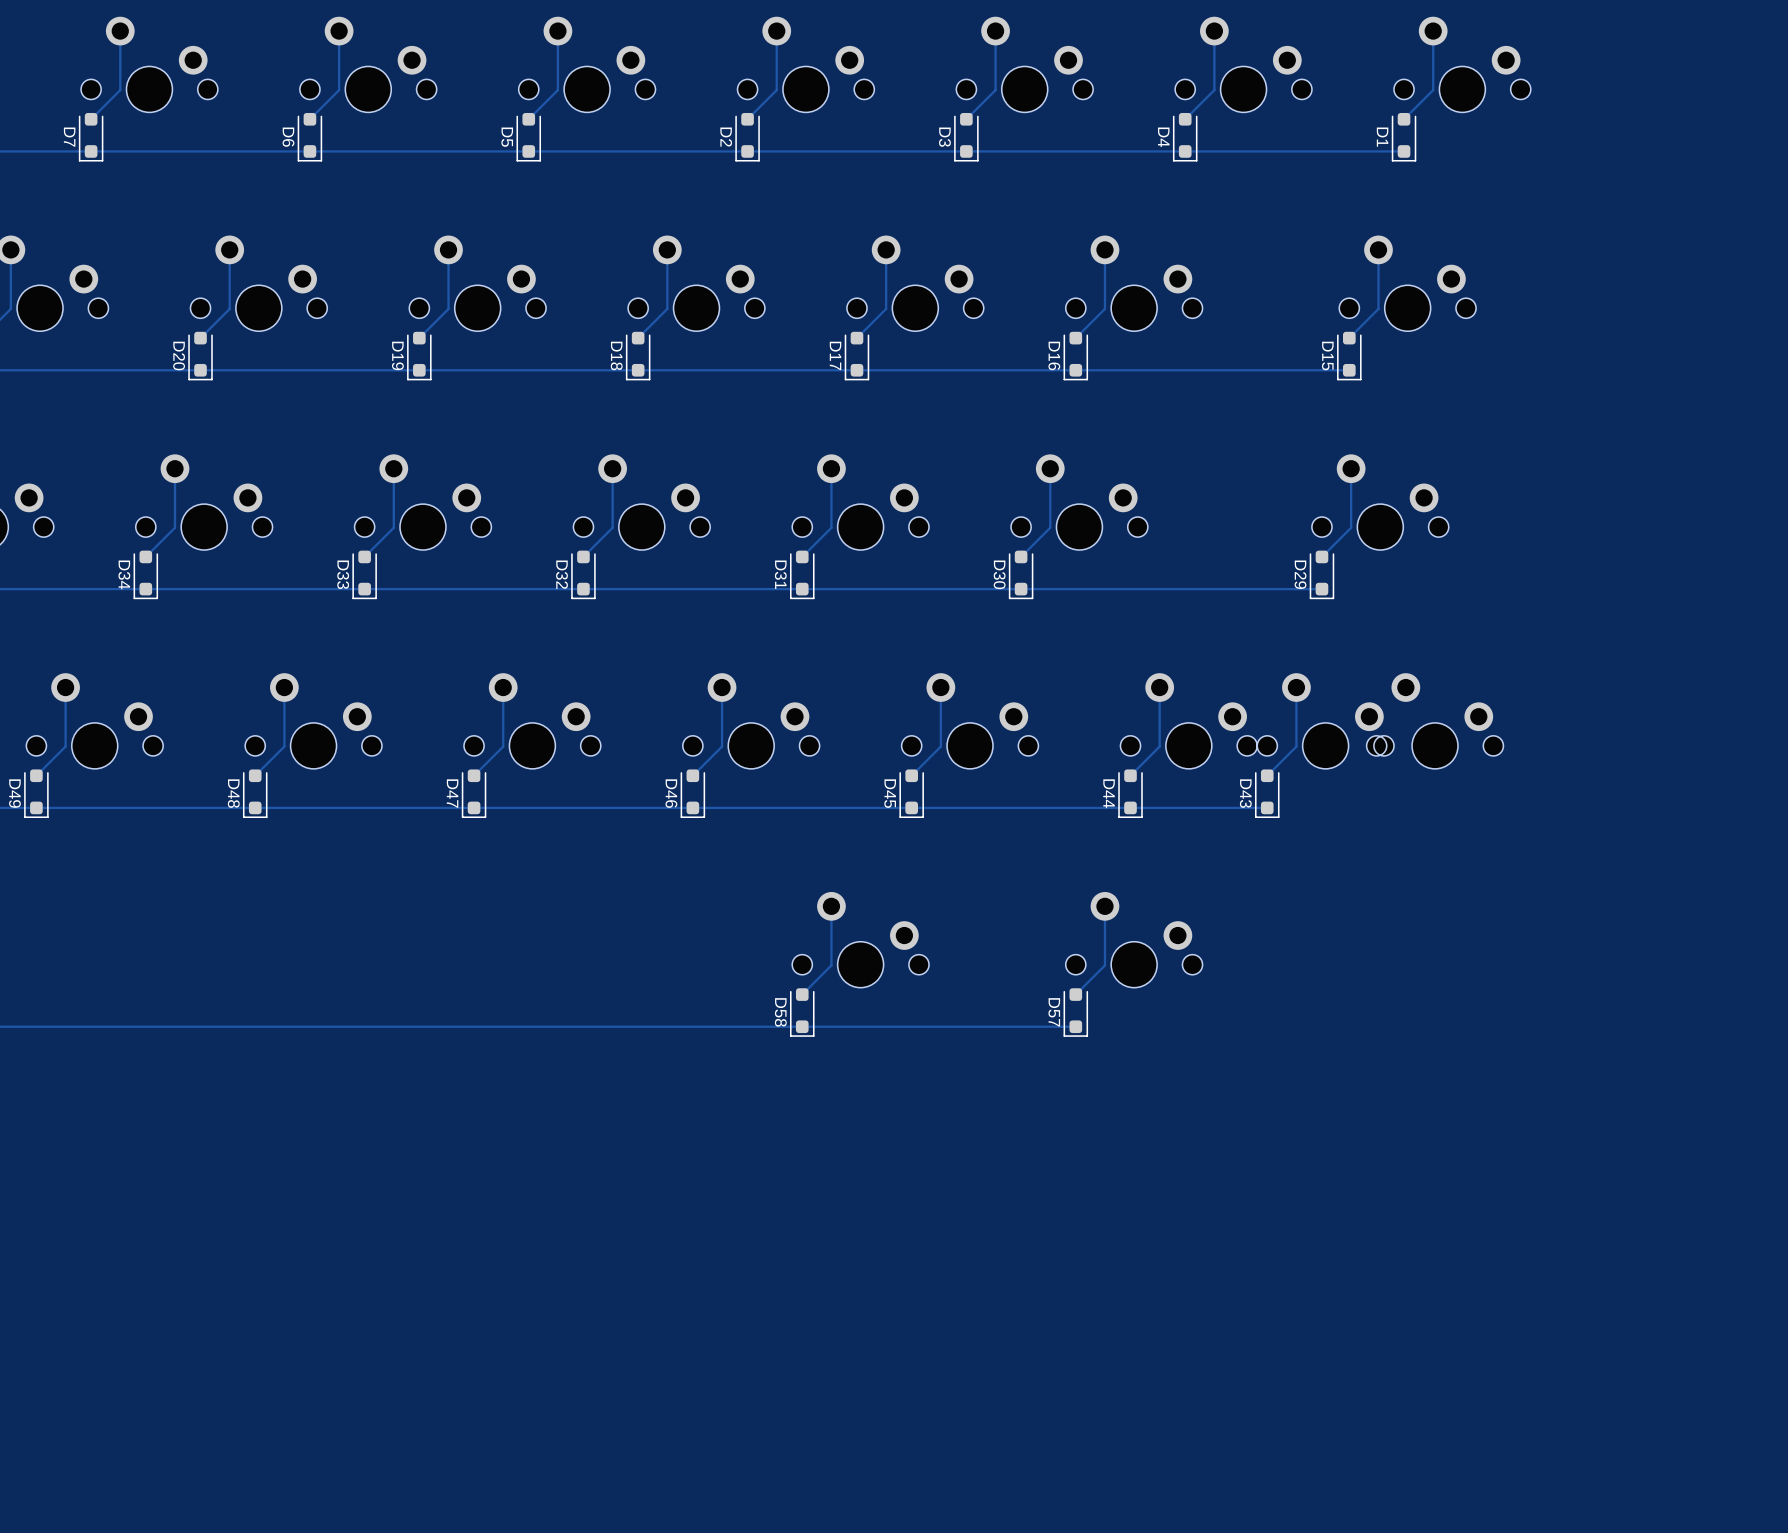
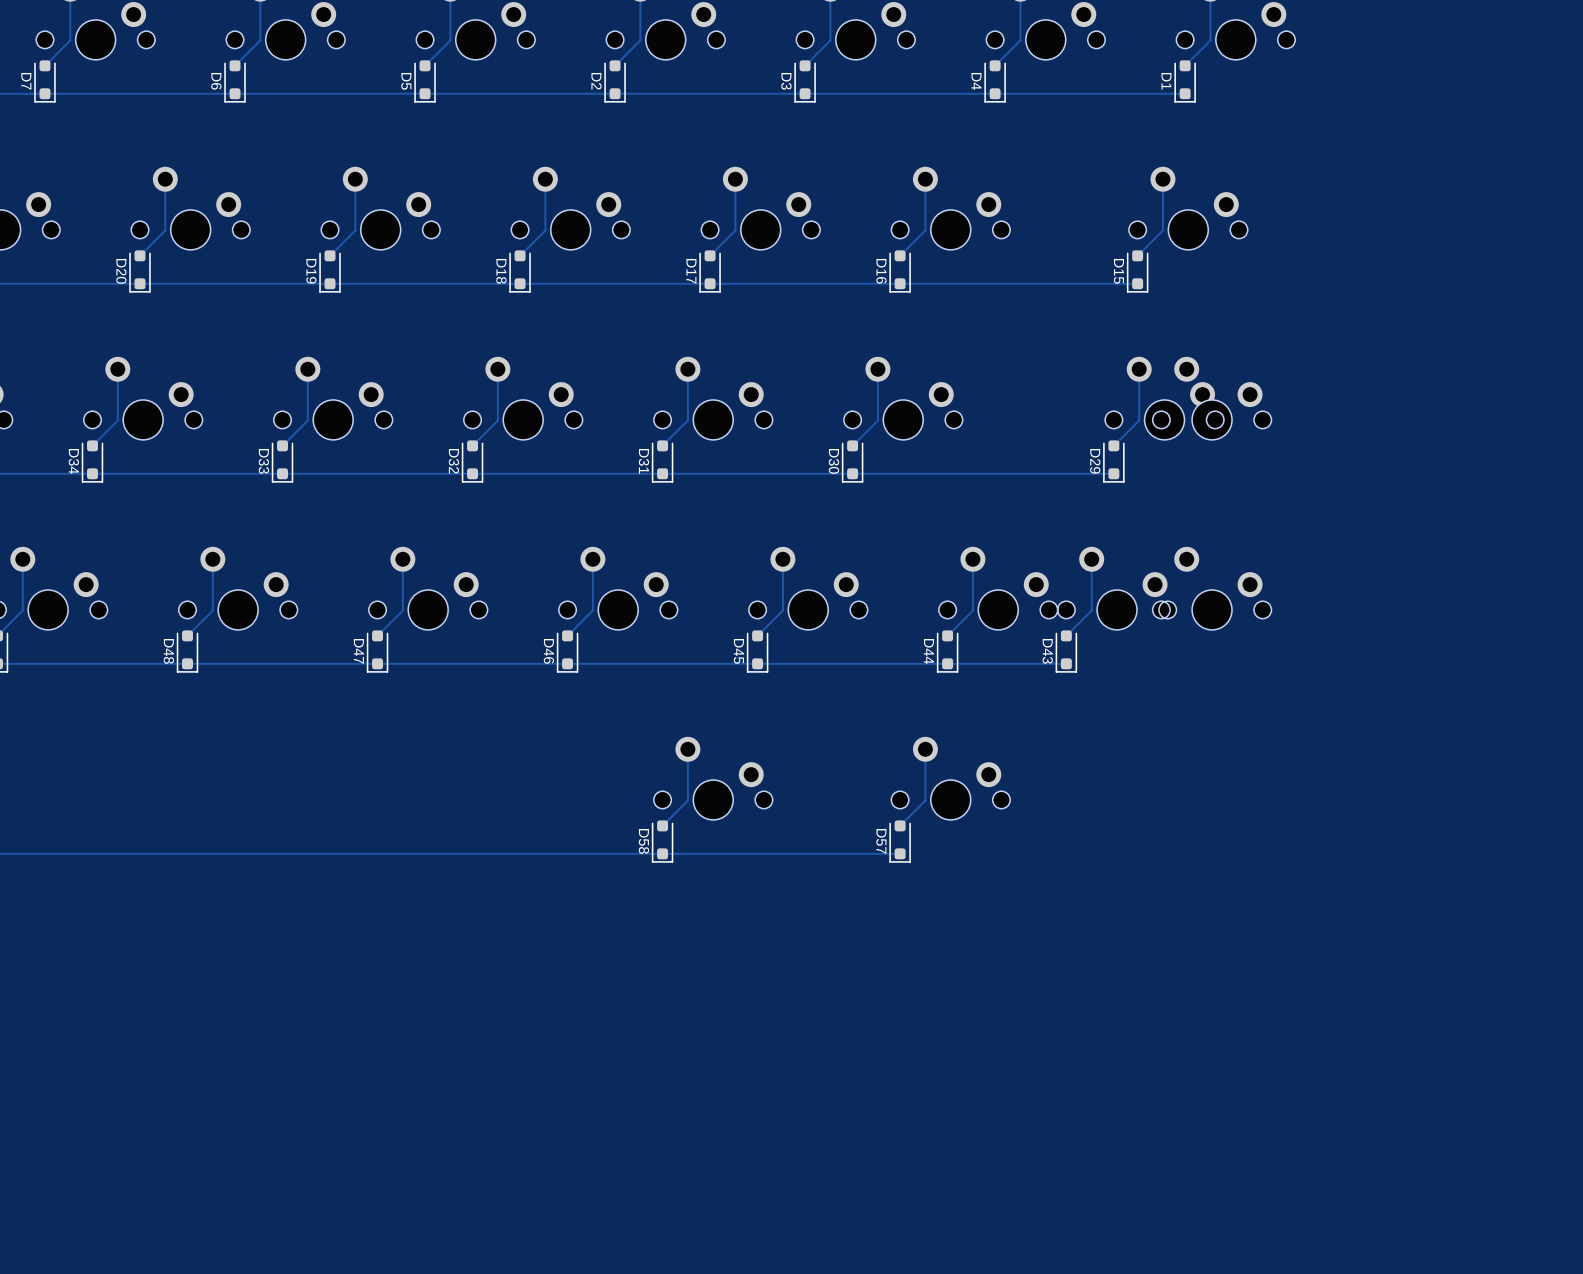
part: none -> (1212, 398)

